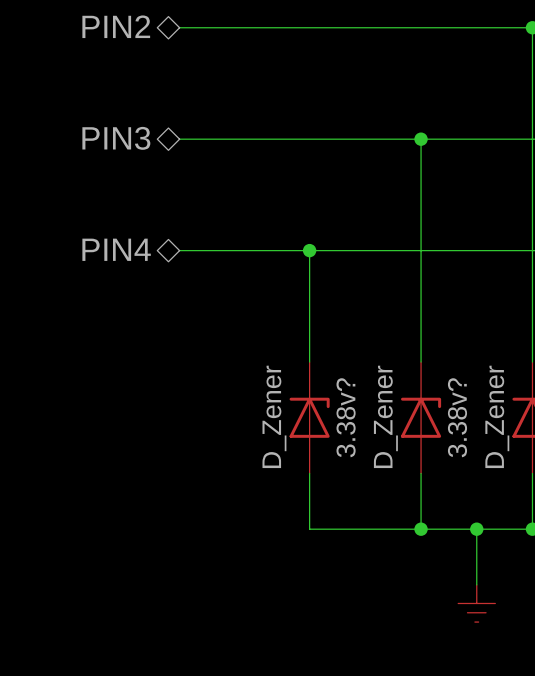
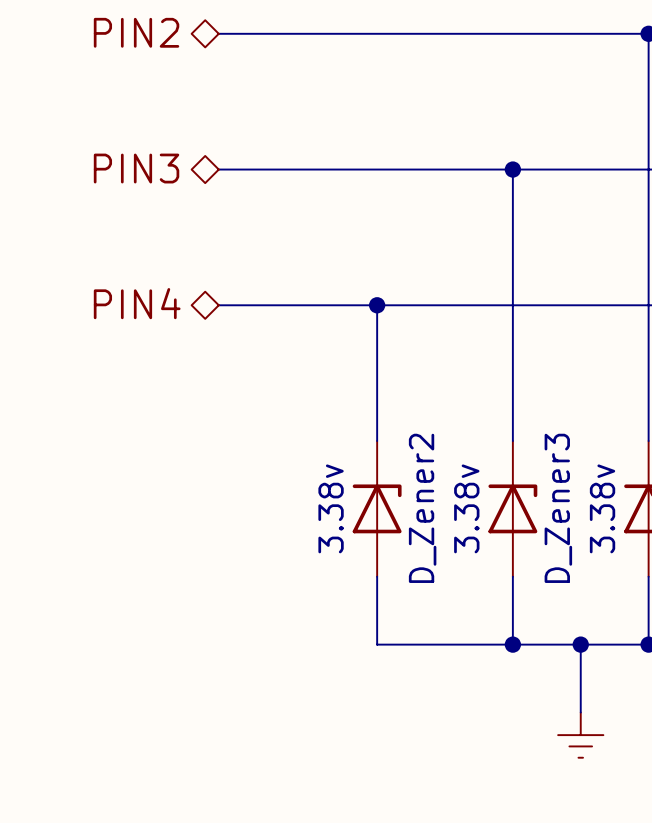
3.38v? value: D_Zener (274, 416) -> 3.38v (331, 508)
3.38v? value: D_Zener (385, 416) -> 3.38v (466, 508)
part value: D_Zener (497, 416) -> 3.38v (602, 508)
3.38v? name: 3.38v? (346, 417) -> D_Zener2 (422, 508)
3.38v? name: 3.38v? (457, 417) -> D_Zener3 (558, 508)

